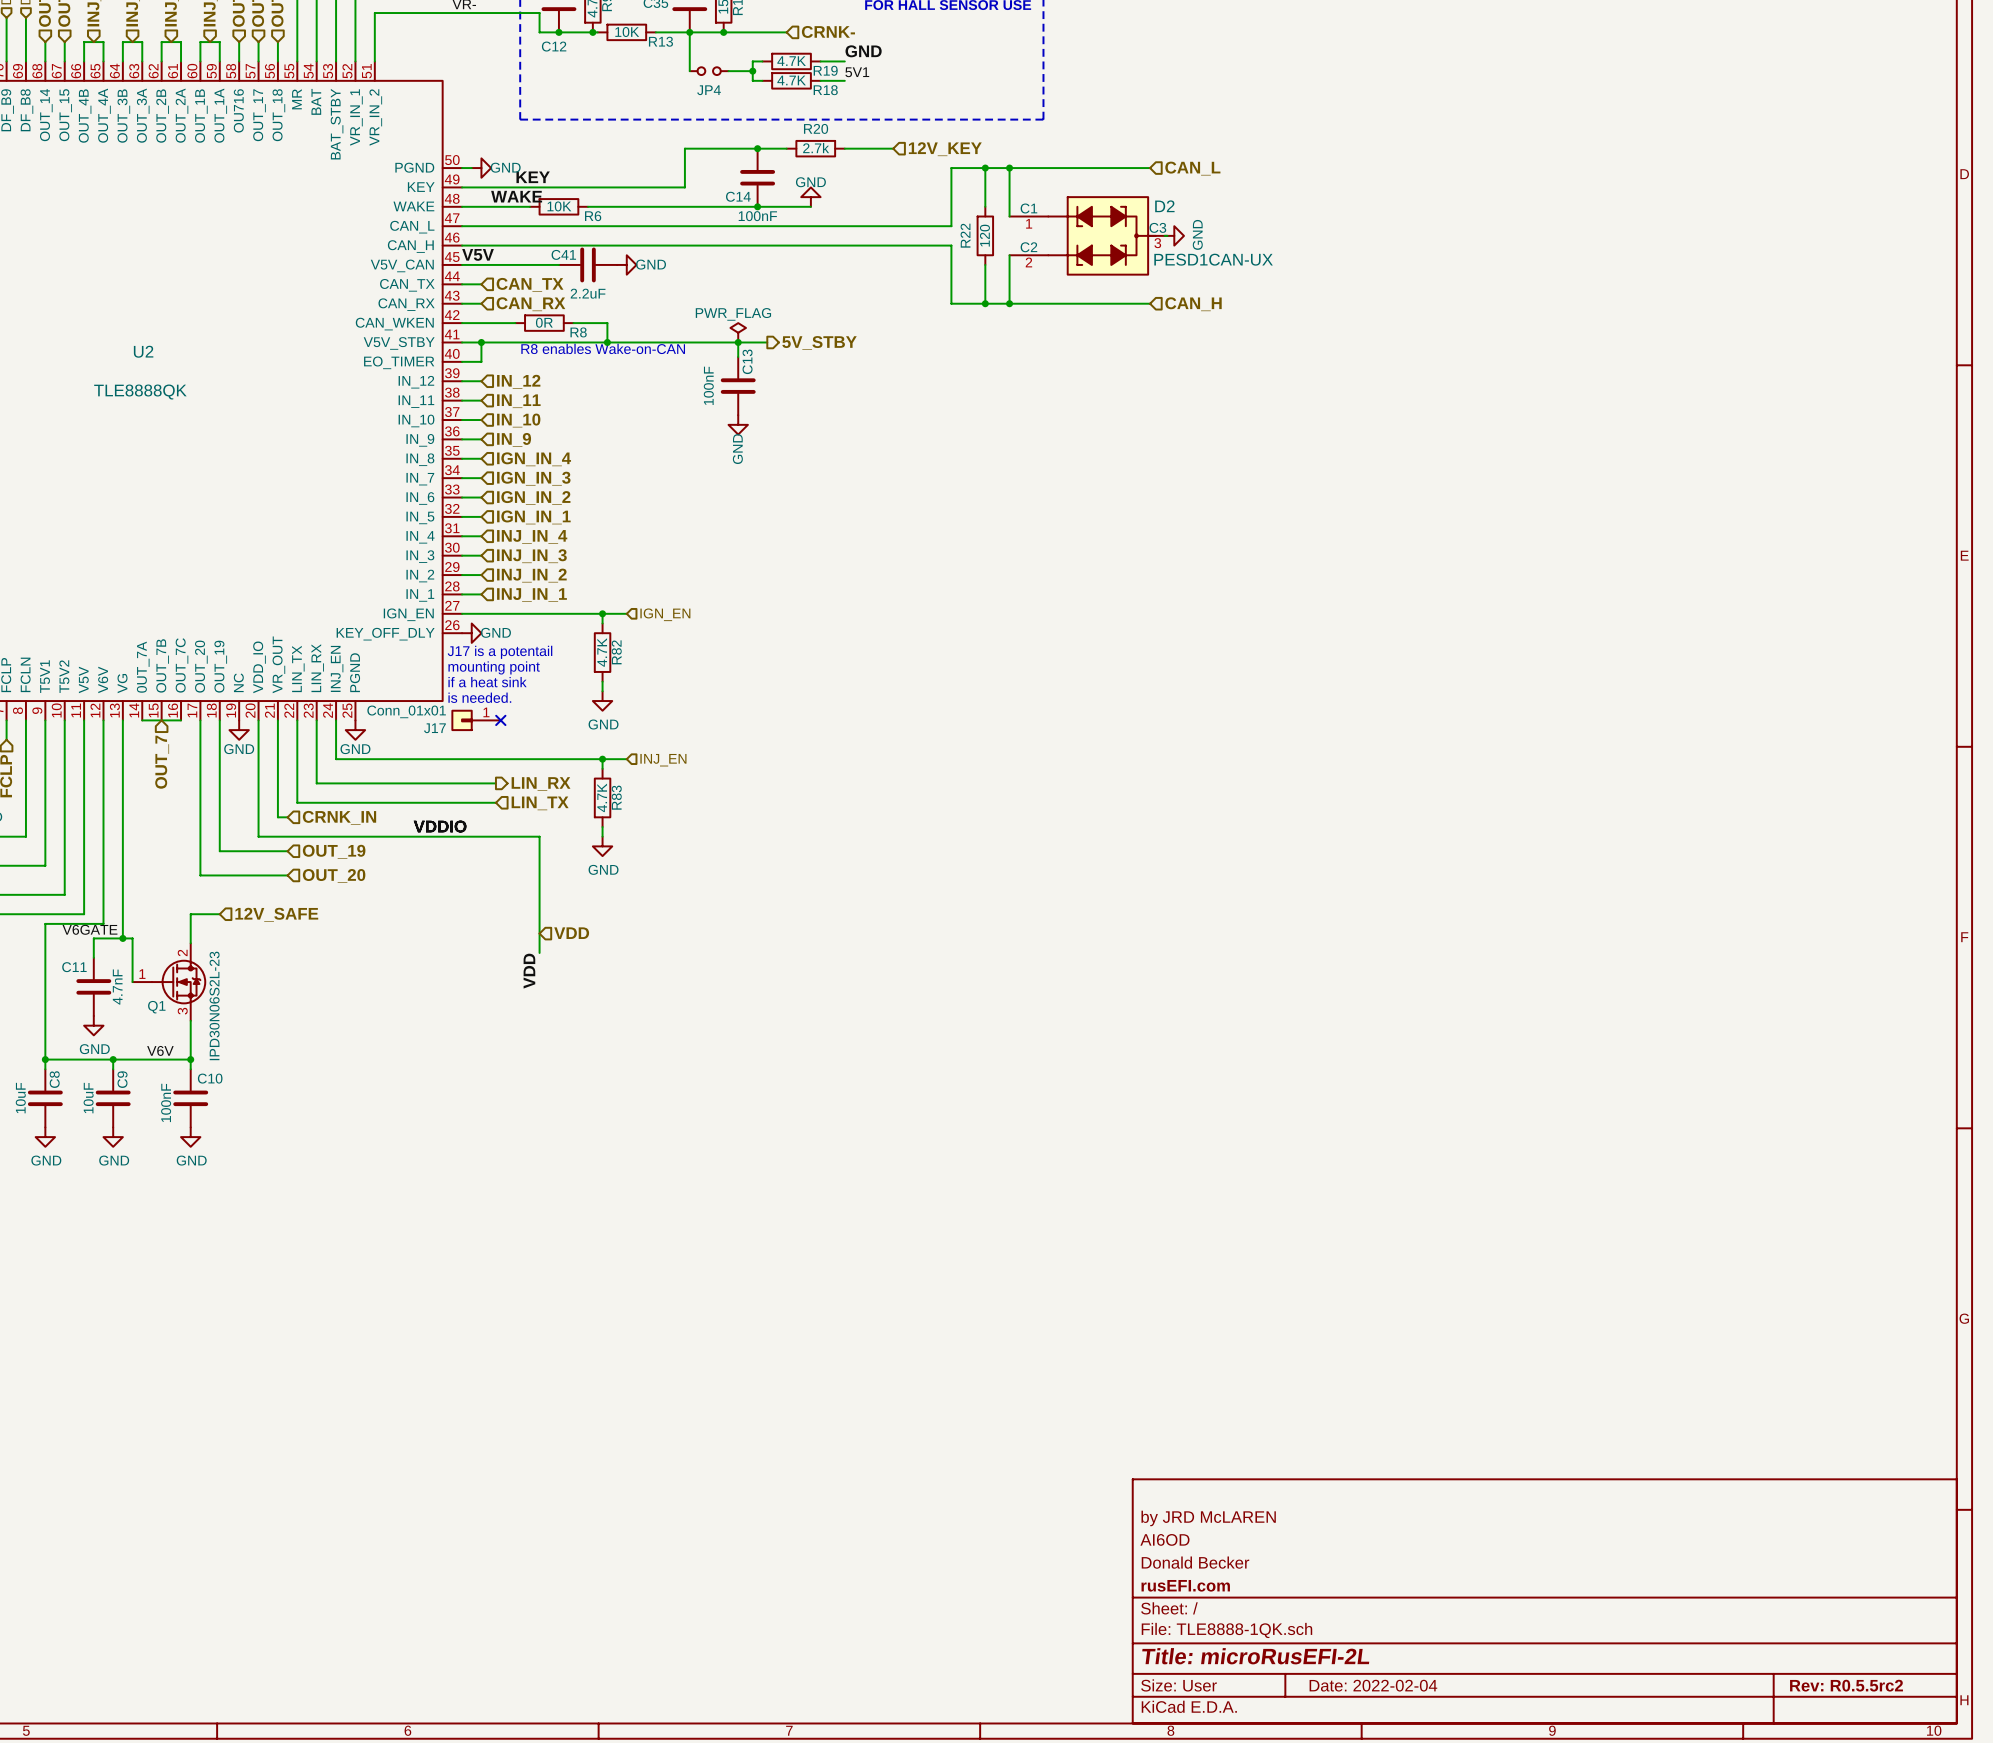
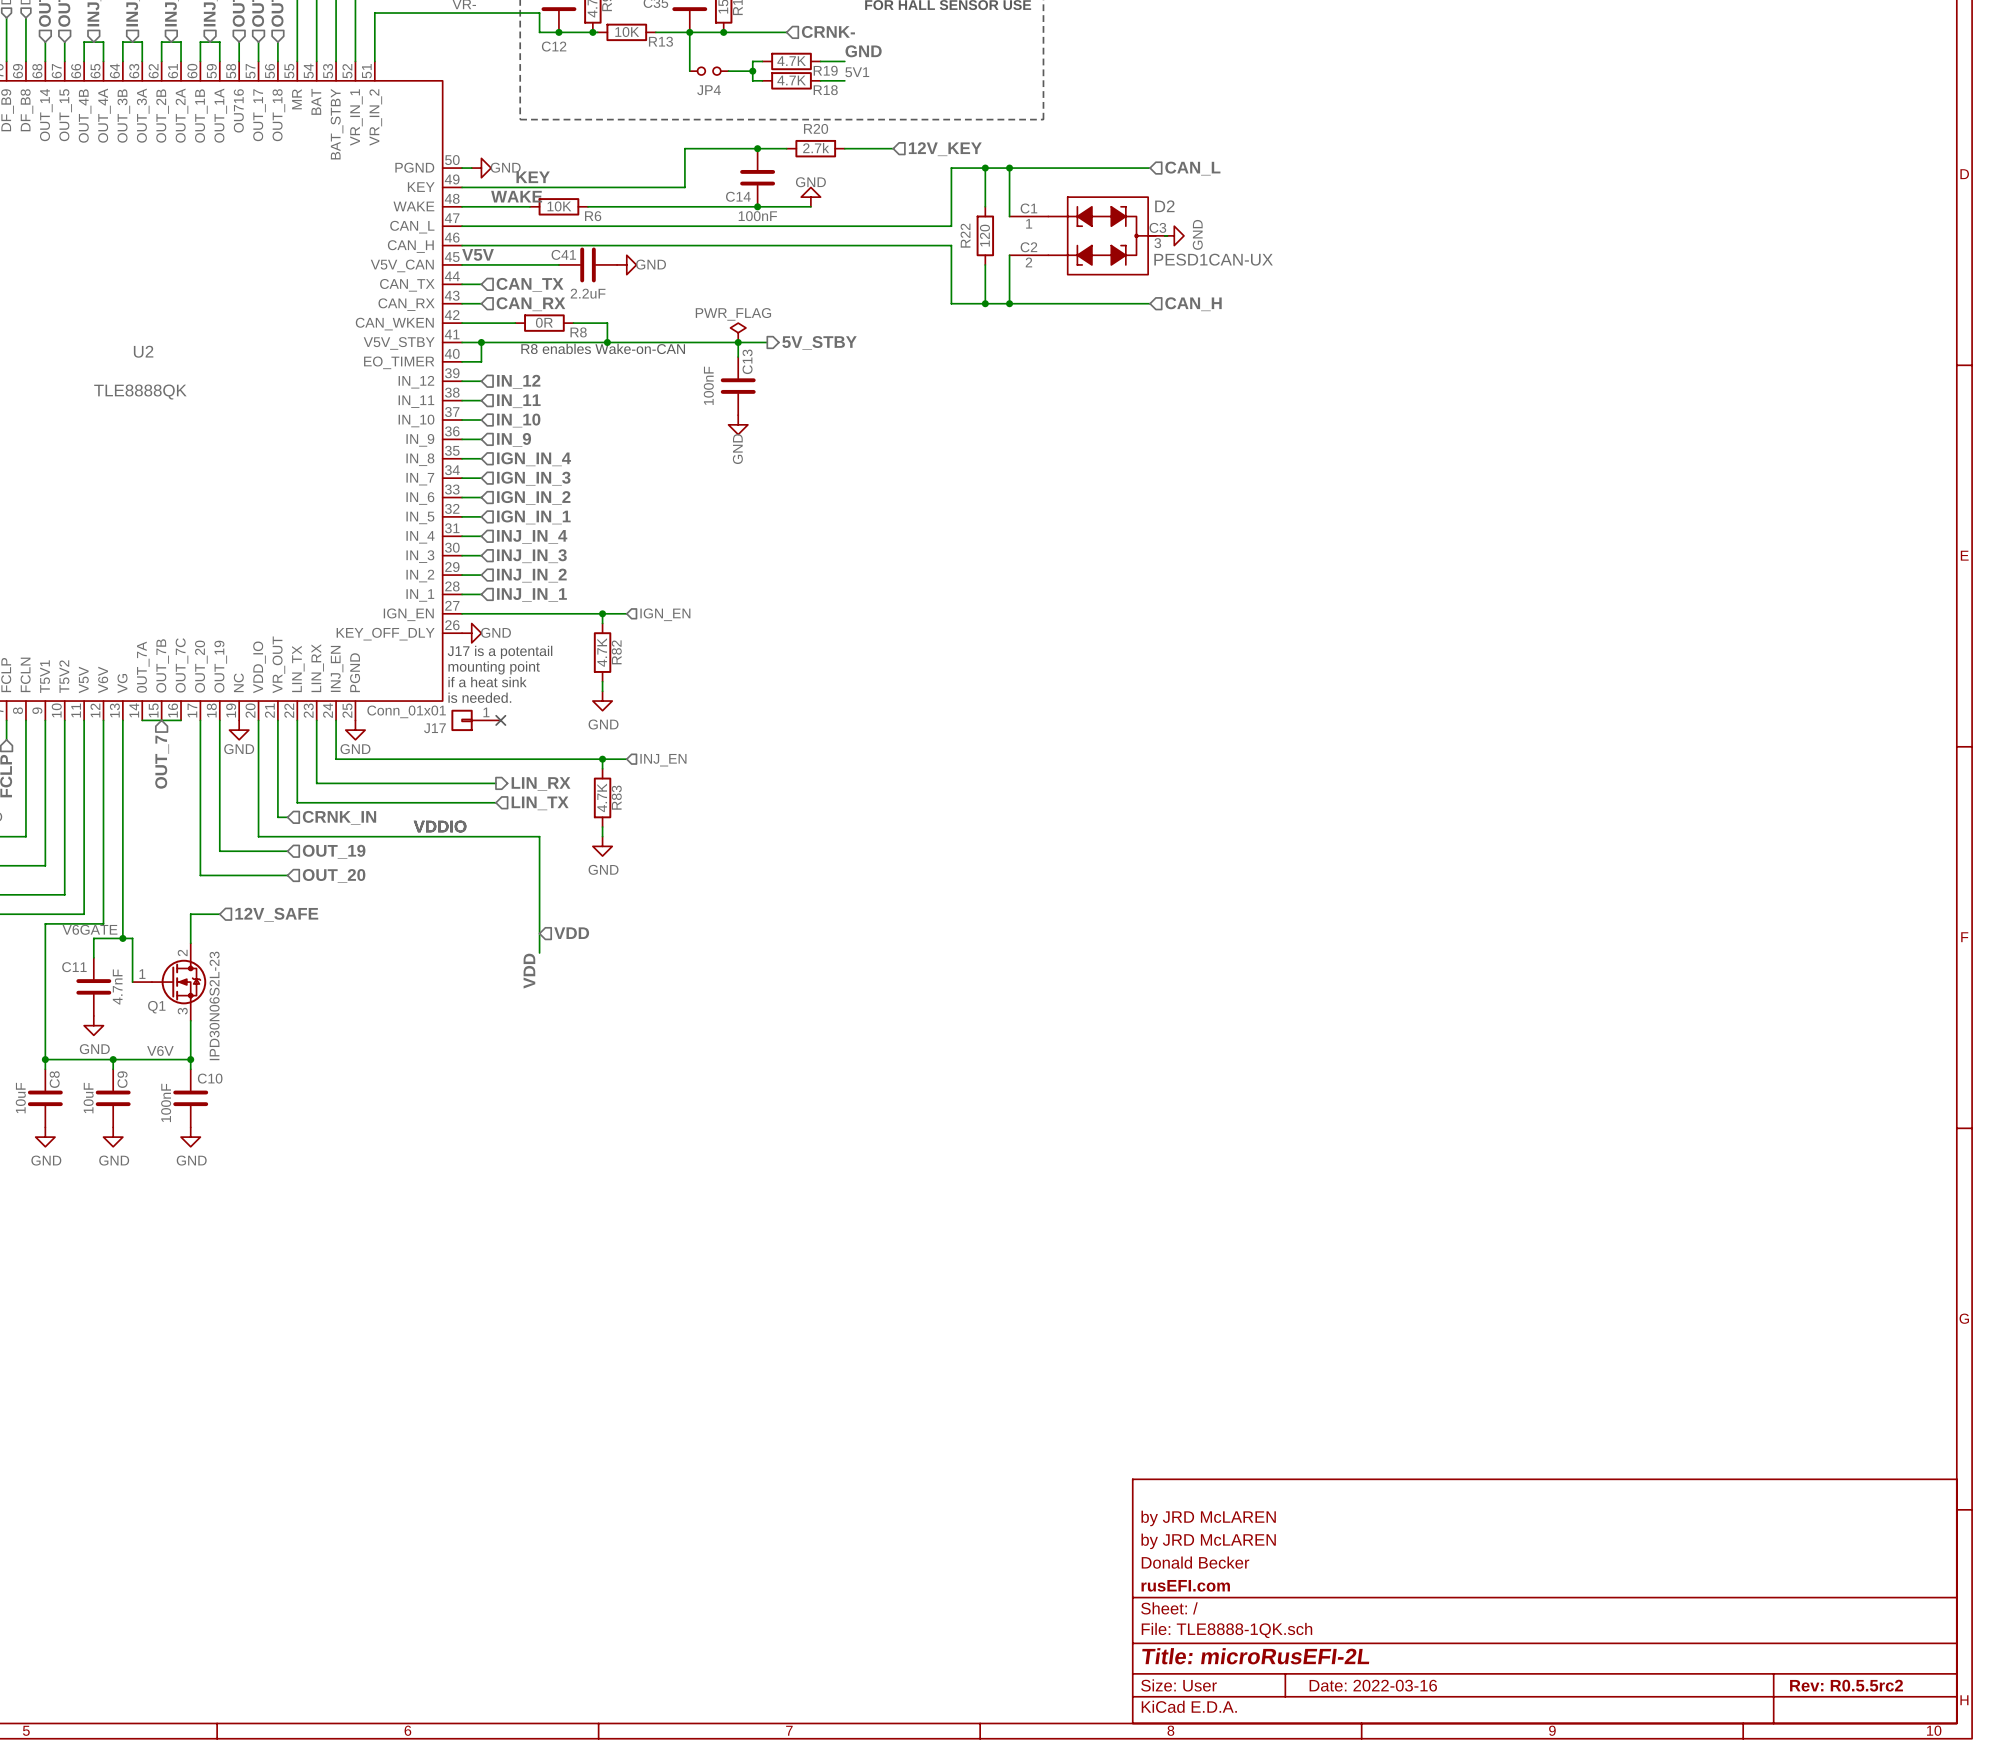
title block: AI6OD (1164, 1539) -> by JRD McLAREN (1208, 1541)
title block: Date: 2022-02-04 (1373, 1685) -> Date: 2022-03-16 (1373, 1685)

